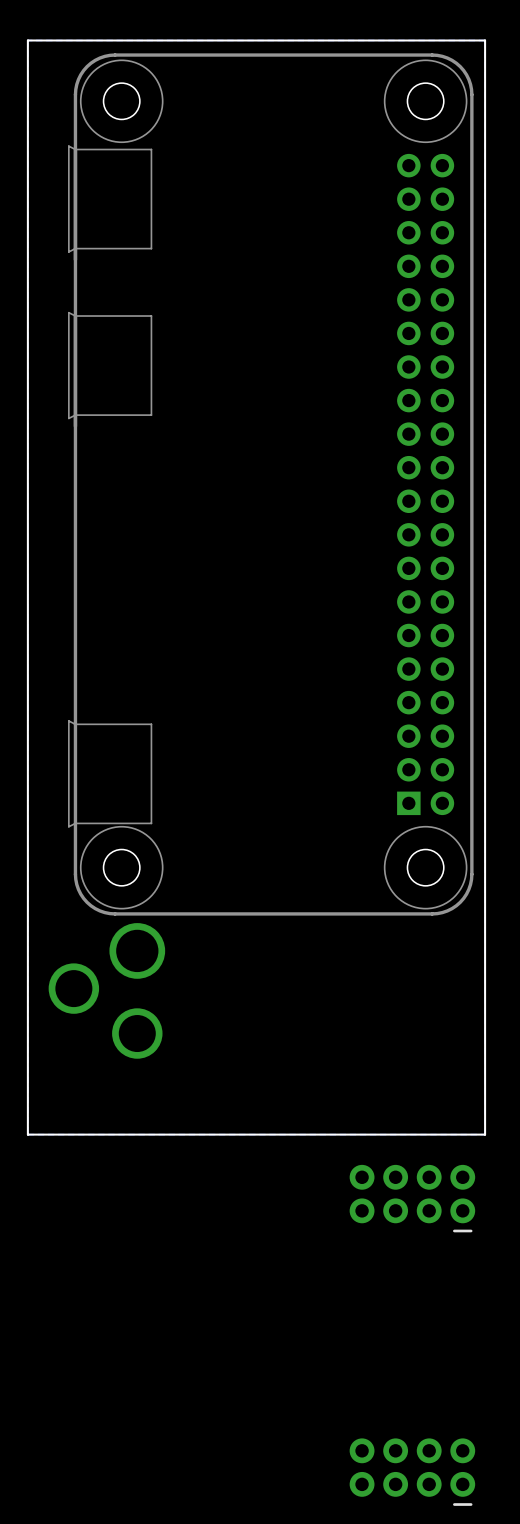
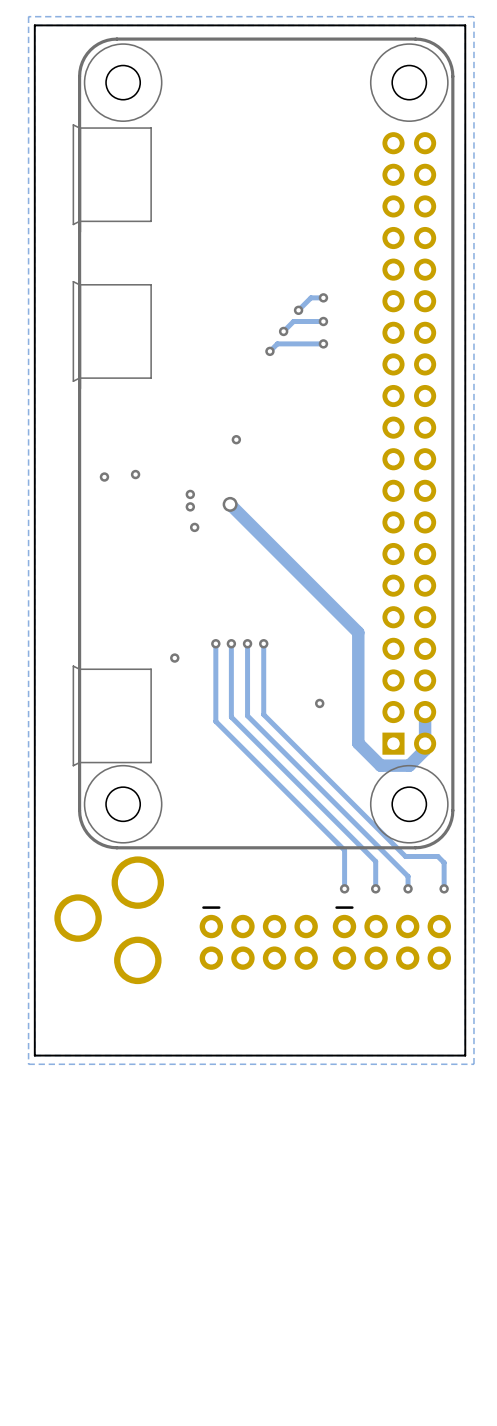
zone outline: none -> (473, 16) (28, 16) (28, 1064) (473, 1064) (473, 16)
track: none -> (323, 297) (311, 297) (298, 310)
via: none -> (323, 297)
via: none -> (298, 310)
track: none -> (323, 321) (293, 321) (283, 331)
via: none -> (323, 321)
via: none -> (283, 331)
track: none -> (323, 343) (277, 343) (269, 351)
via: none -> (323, 343)
via: none -> (269, 351)
via: none -> (236, 439)
via: none -> (135, 474)
via: none -> (104, 477)
via: none -> (190, 494)
track: none -> (230, 504) (358, 632) (358, 743) (380, 765) (409, 765) (425, 749) (425, 712)
via: none -> (230, 504)
via: none -> (190, 506)
via: none -> (194, 527)
track: none -> (215, 643) (215, 721) (344, 850) (344, 888)
via: none -> (215, 643)
track: none -> (231, 643) (231, 717) (375, 861) (375, 888)
via: none -> (231, 643)
track: none -> (247, 643) (247, 715) (408, 876) (408, 888)
via: none -> (247, 643)
track: none -> (263, 643) (263, 714) (405, 856) (437, 856) (444, 862) (444, 888)
via: none -> (263, 643)
via: none -> (174, 658)
via: none -> (319, 703)
via: none -> (344, 888)
via: none -> (375, 888)
via: none -> (408, 888)
via: none -> (444, 888)
part: none -> (258, 938)
part: none -> (391, 938)
part: (412, 1198) -> none
part: (412, 1472) -> none

